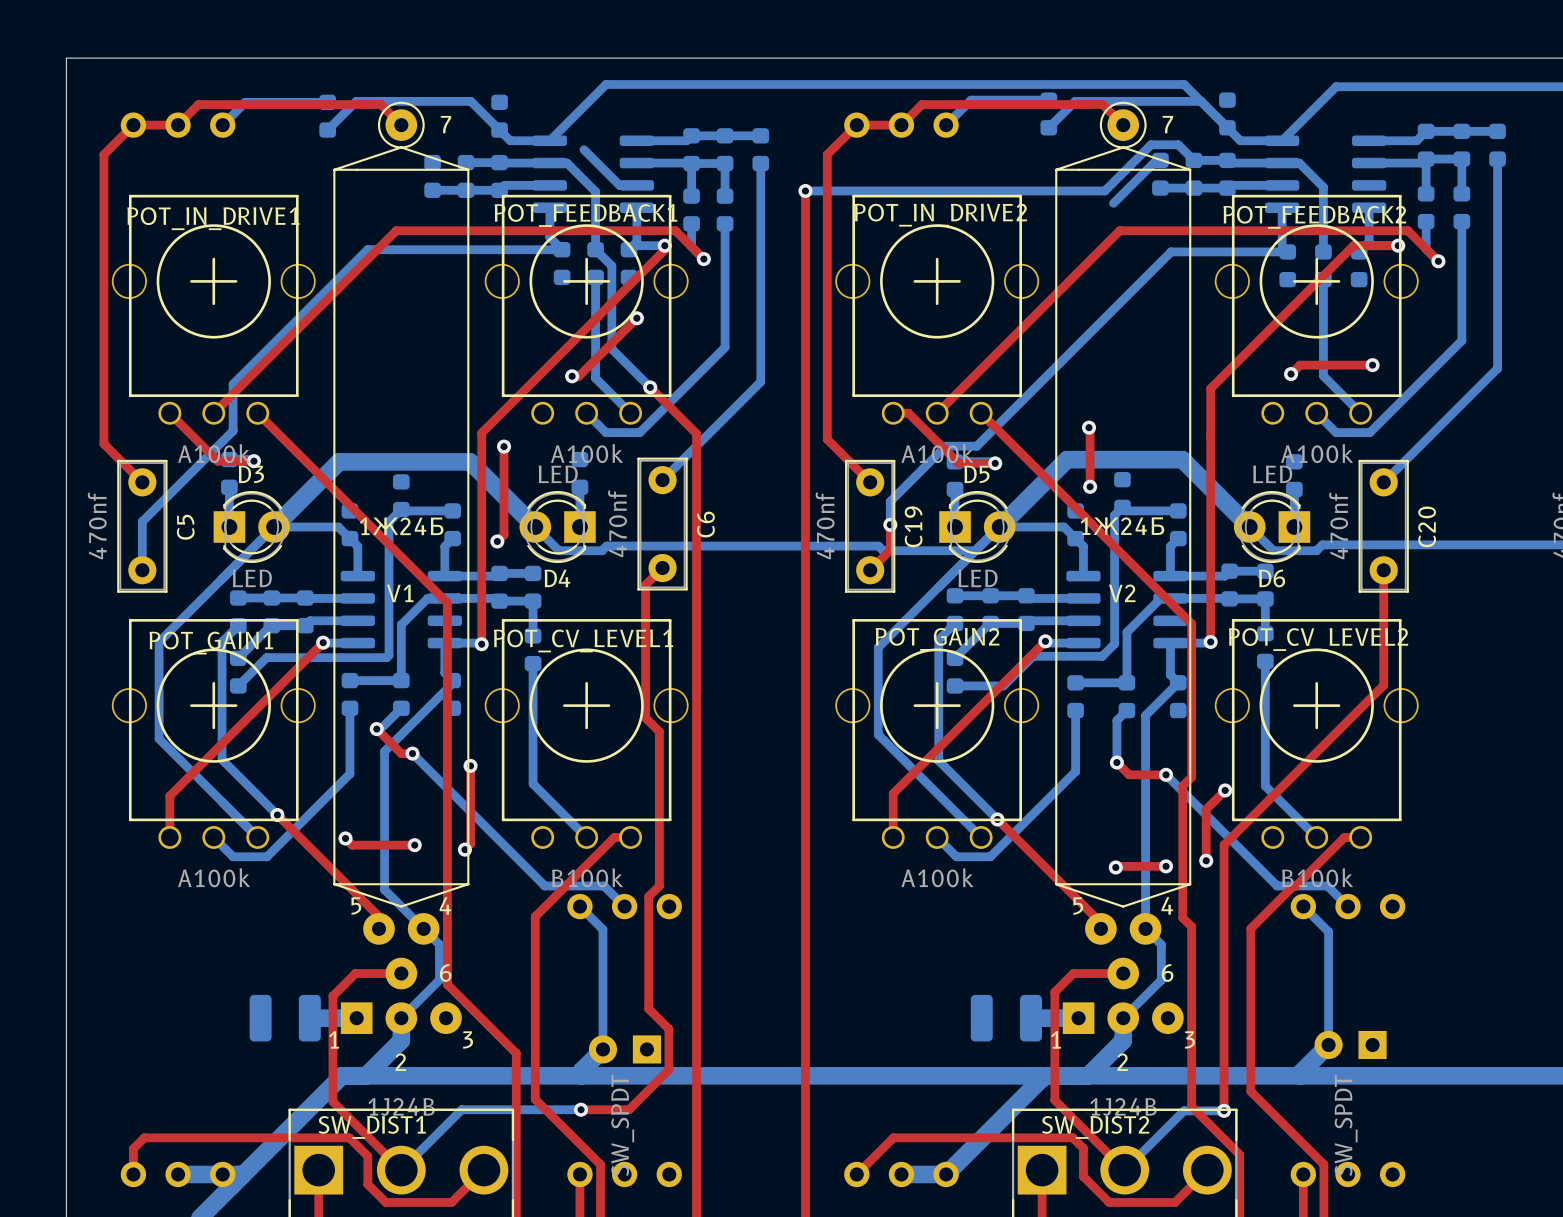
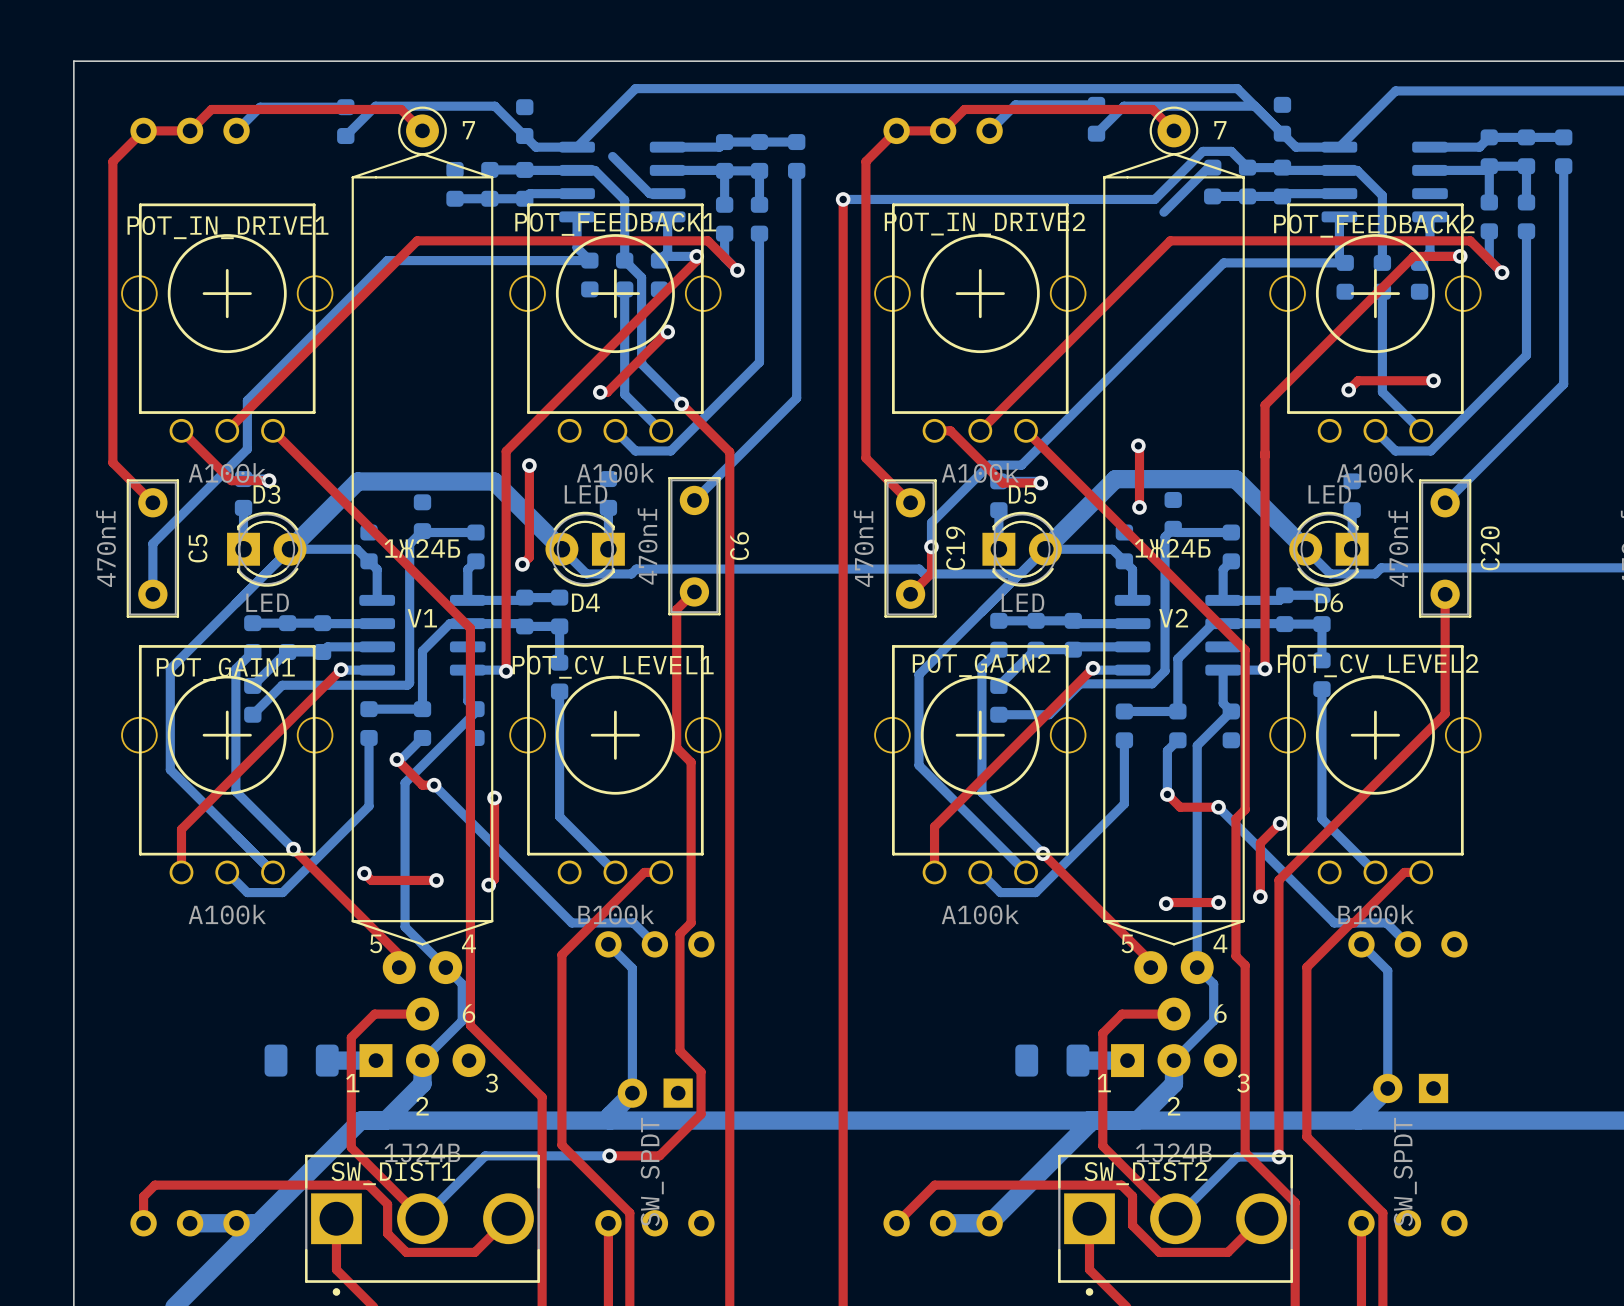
part footprint: [249, 994, 321, 1042] -> [264, 1044, 339, 1077]
part footprint: [970, 994, 1042, 1042] -> [1015, 1044, 1090, 1077]

